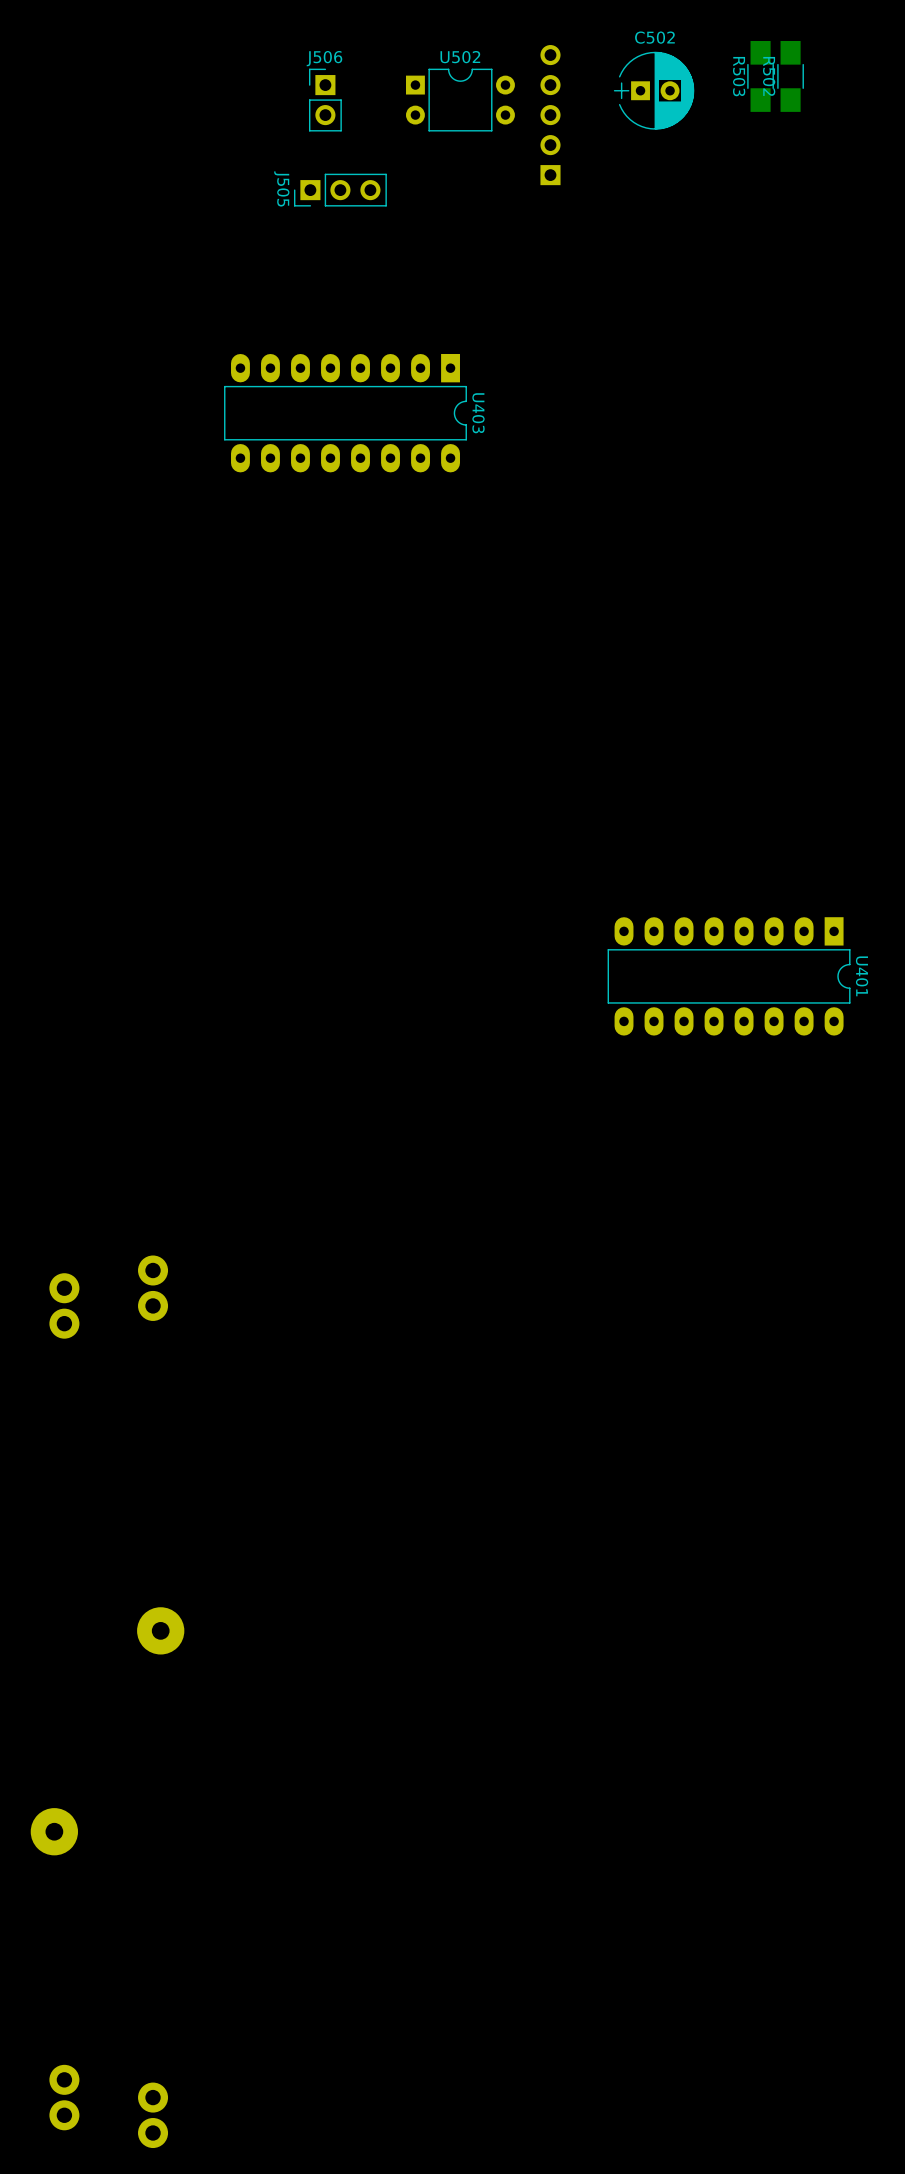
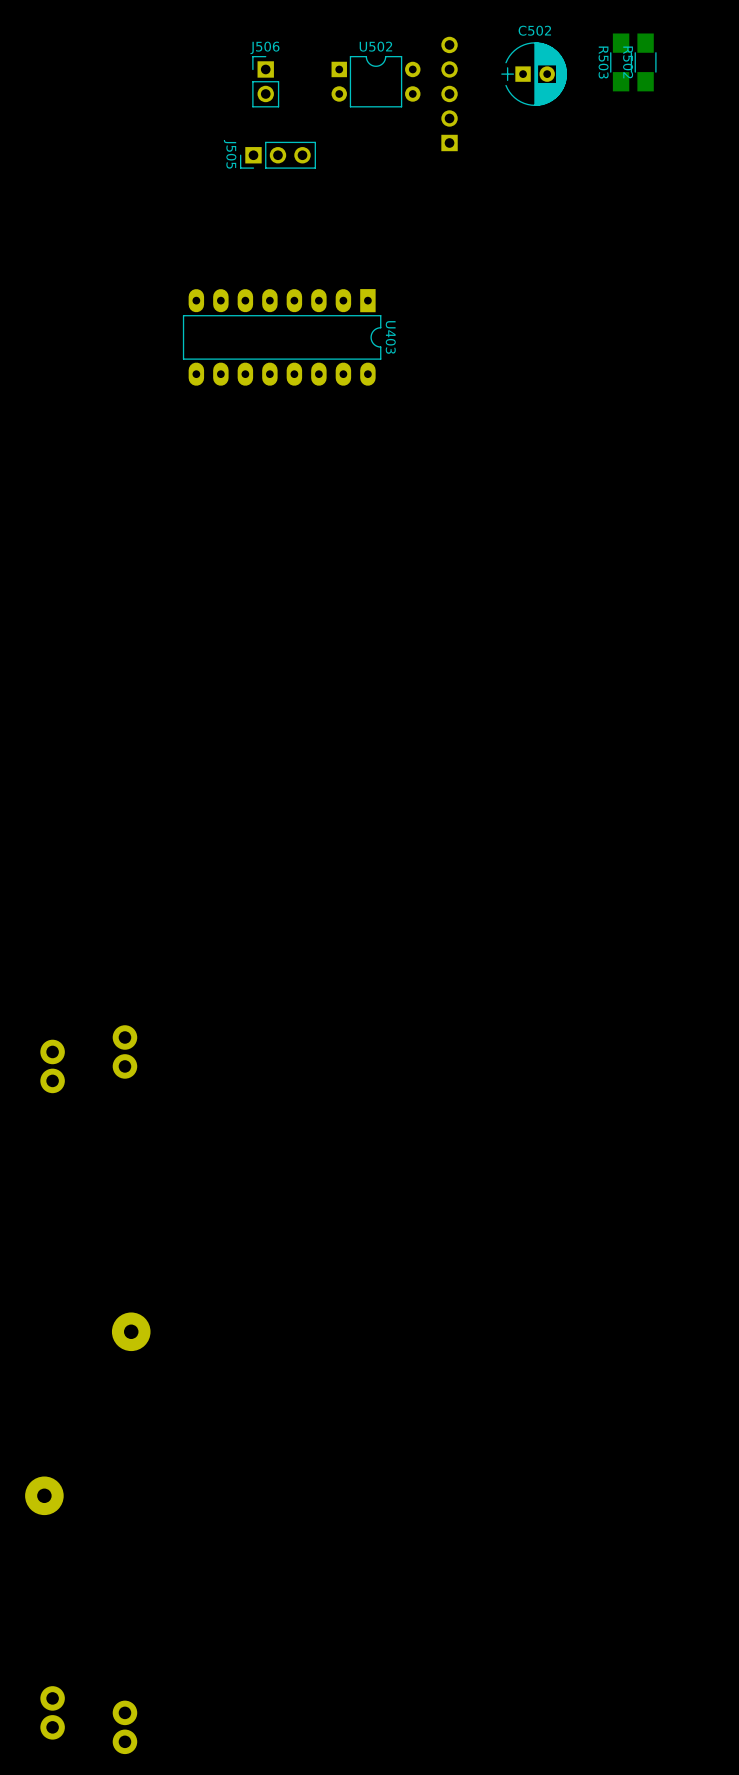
U401: (729, 976) -> none

